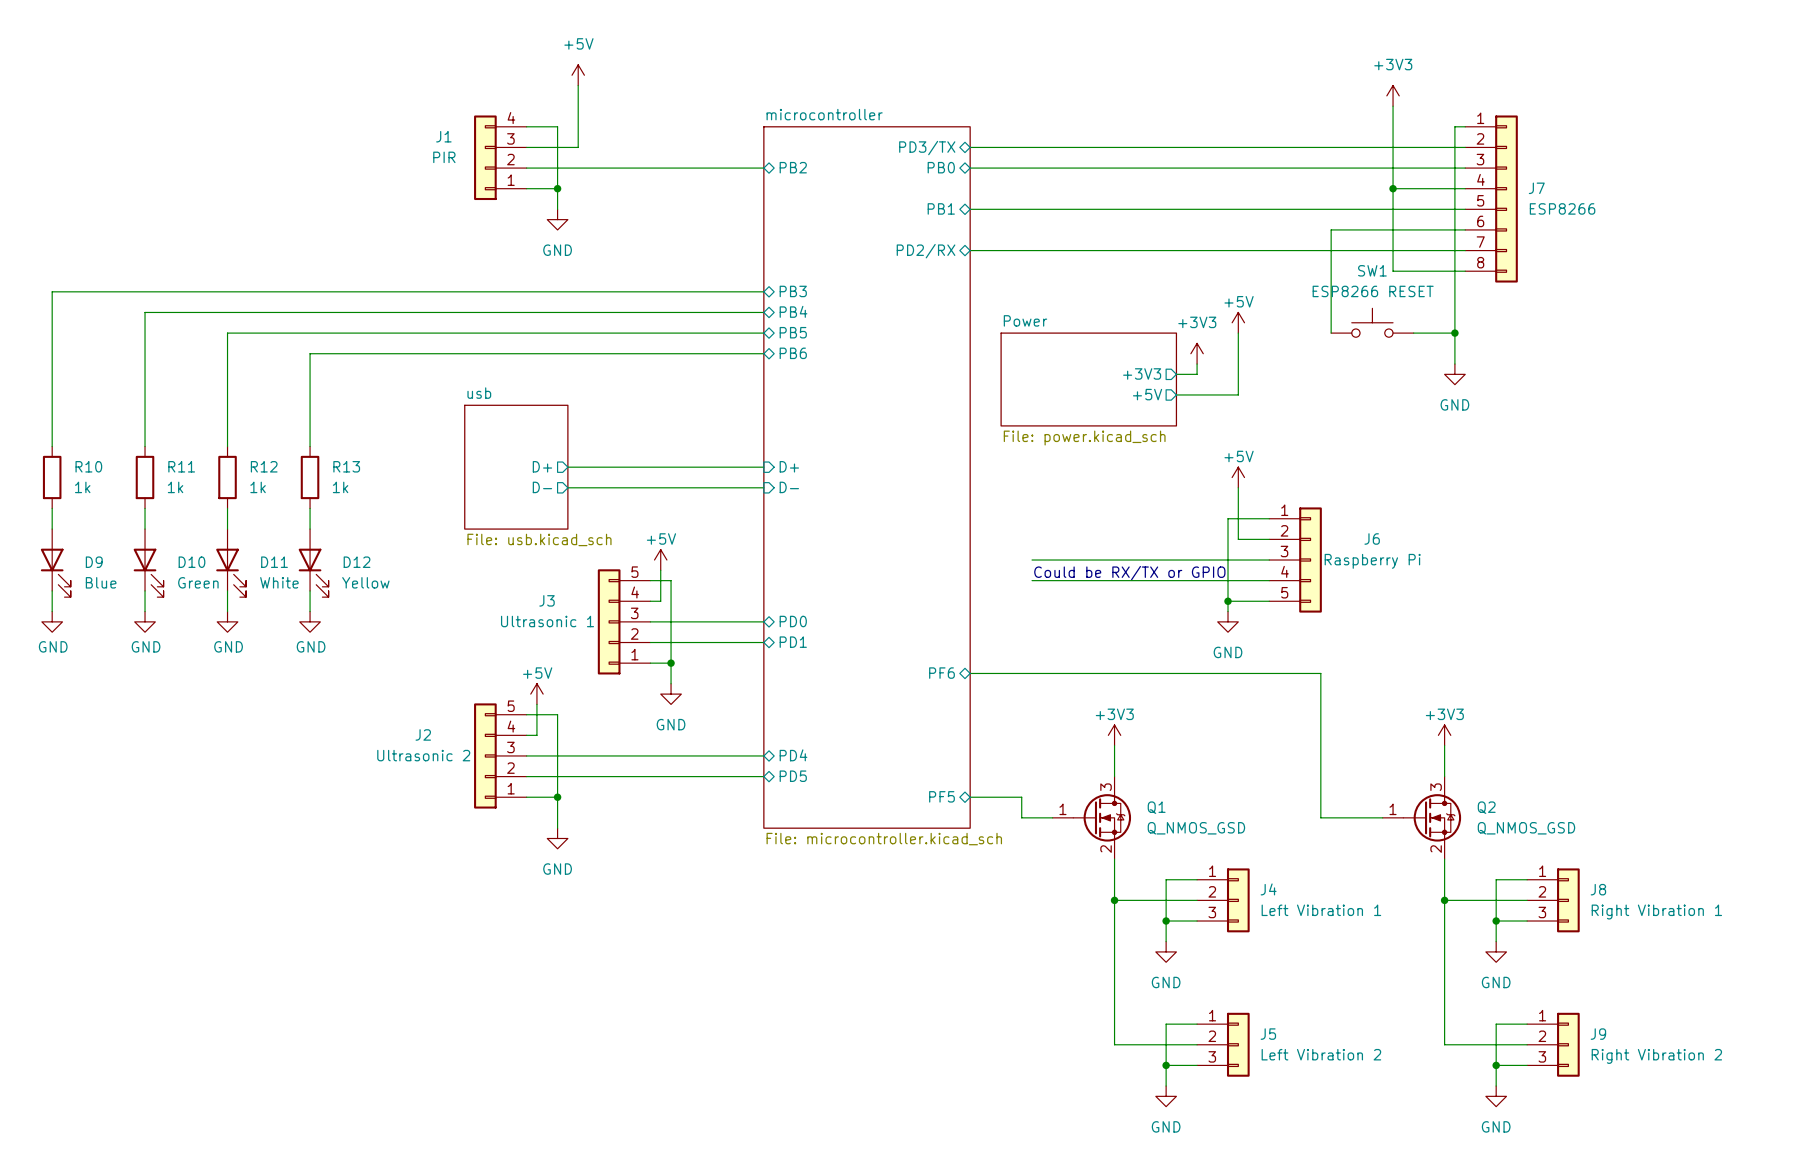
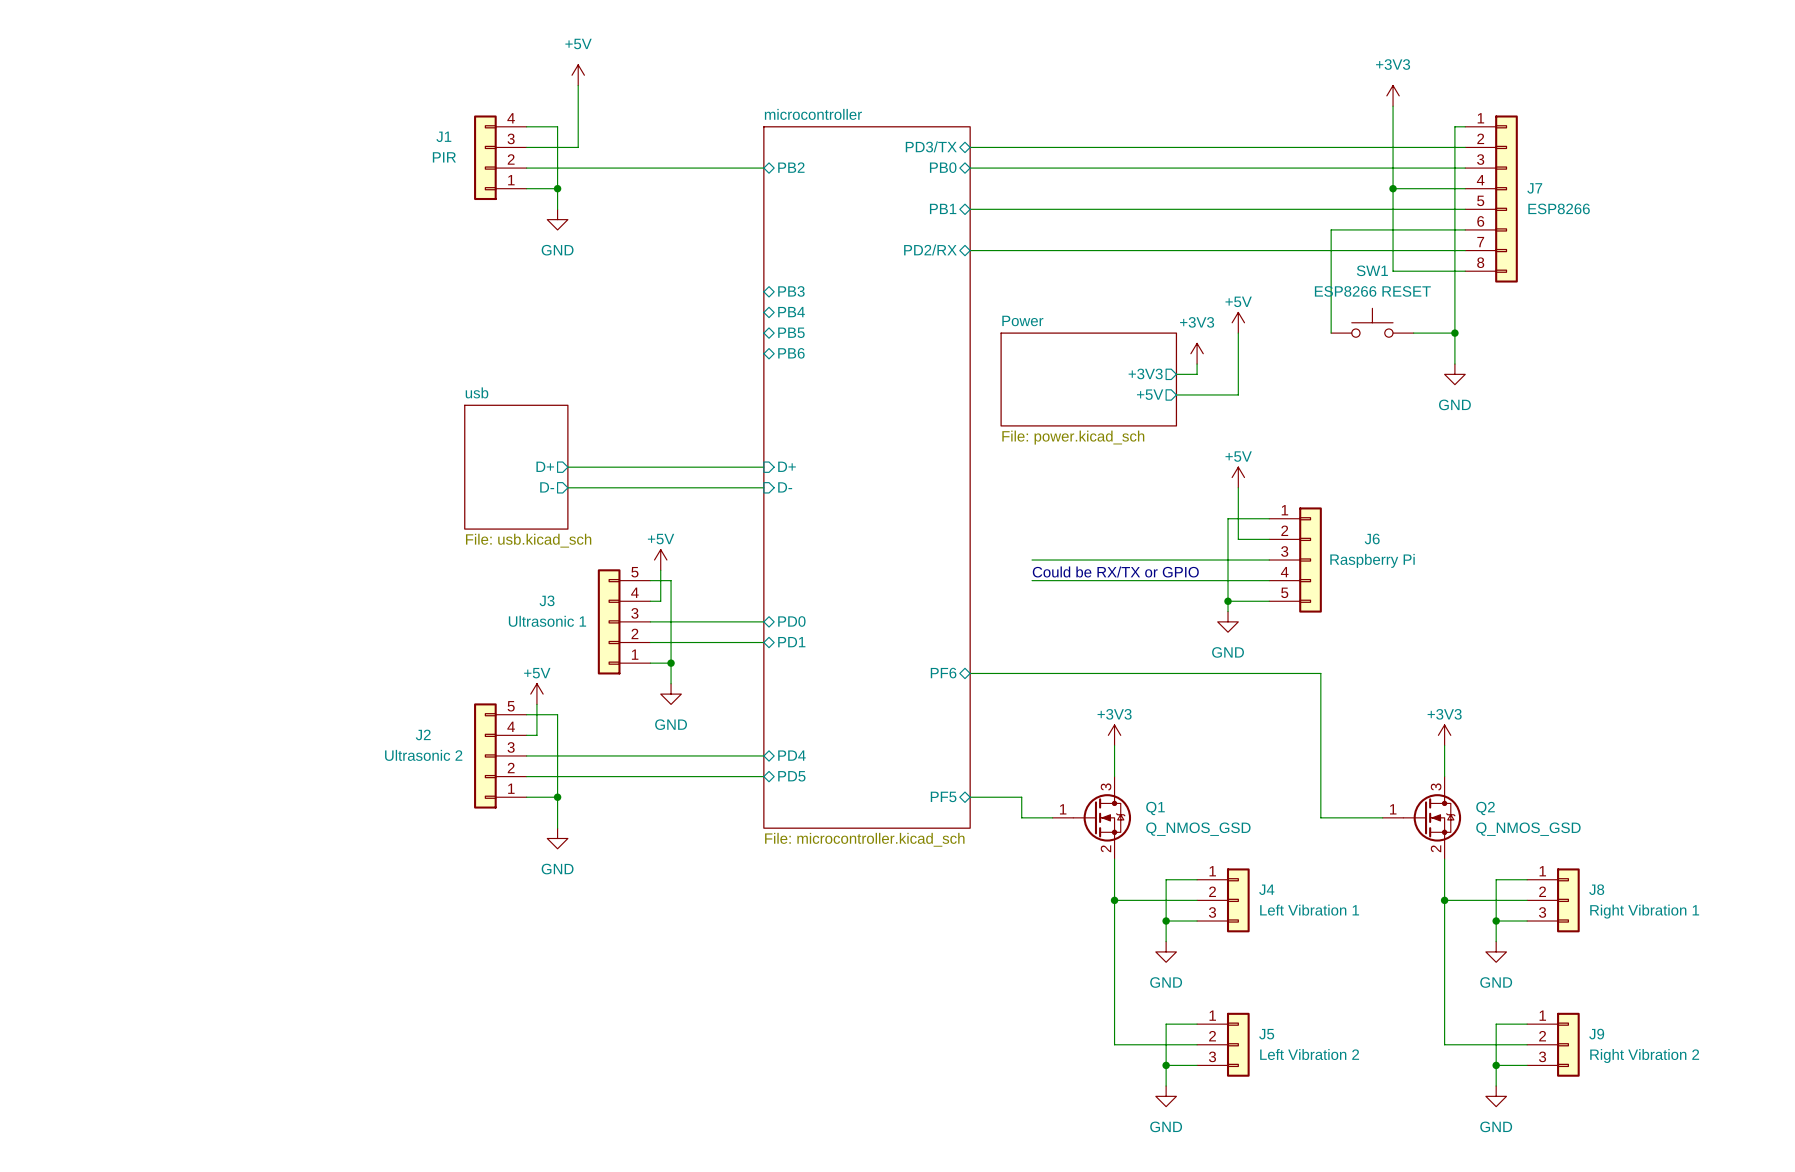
wire: (763, 291) (52, 291) (52, 446) -> none
wire: (763, 312) (145, 312) (145, 446) -> none
wire: (763, 333) (227, 333) (227, 446) -> none
wire: (763, 353) (310, 353) (310, 446) -> none
R10: 1k (52, 477) -> none
R11: 1k (145, 477) -> none
R12: 1k (227, 477) -> none
R13: 1k (310, 477) -> none
wire: (52, 508) (52, 529) -> none
wire: (145, 508) (145, 529) -> none
wire: (227, 508) (227, 529) -> none
wire: (310, 508) (310, 529) -> none
D9: Blue (55, 563) -> none
D10: Green (148, 563) -> none
D11: White (231, 563) -> none
D12: Yellow (313, 563) -> none
wire: (52, 590) (52, 611) -> none
wire: (145, 590) (145, 611) -> none
wire: (227, 590) (227, 611) -> none
wire: (310, 590) (310, 611) -> none
power symbol: GND (52, 621) -> none
power symbol: GND (145, 621) -> none
power symbol: GND (227, 621) -> none
power symbol: GND (310, 621) -> none

